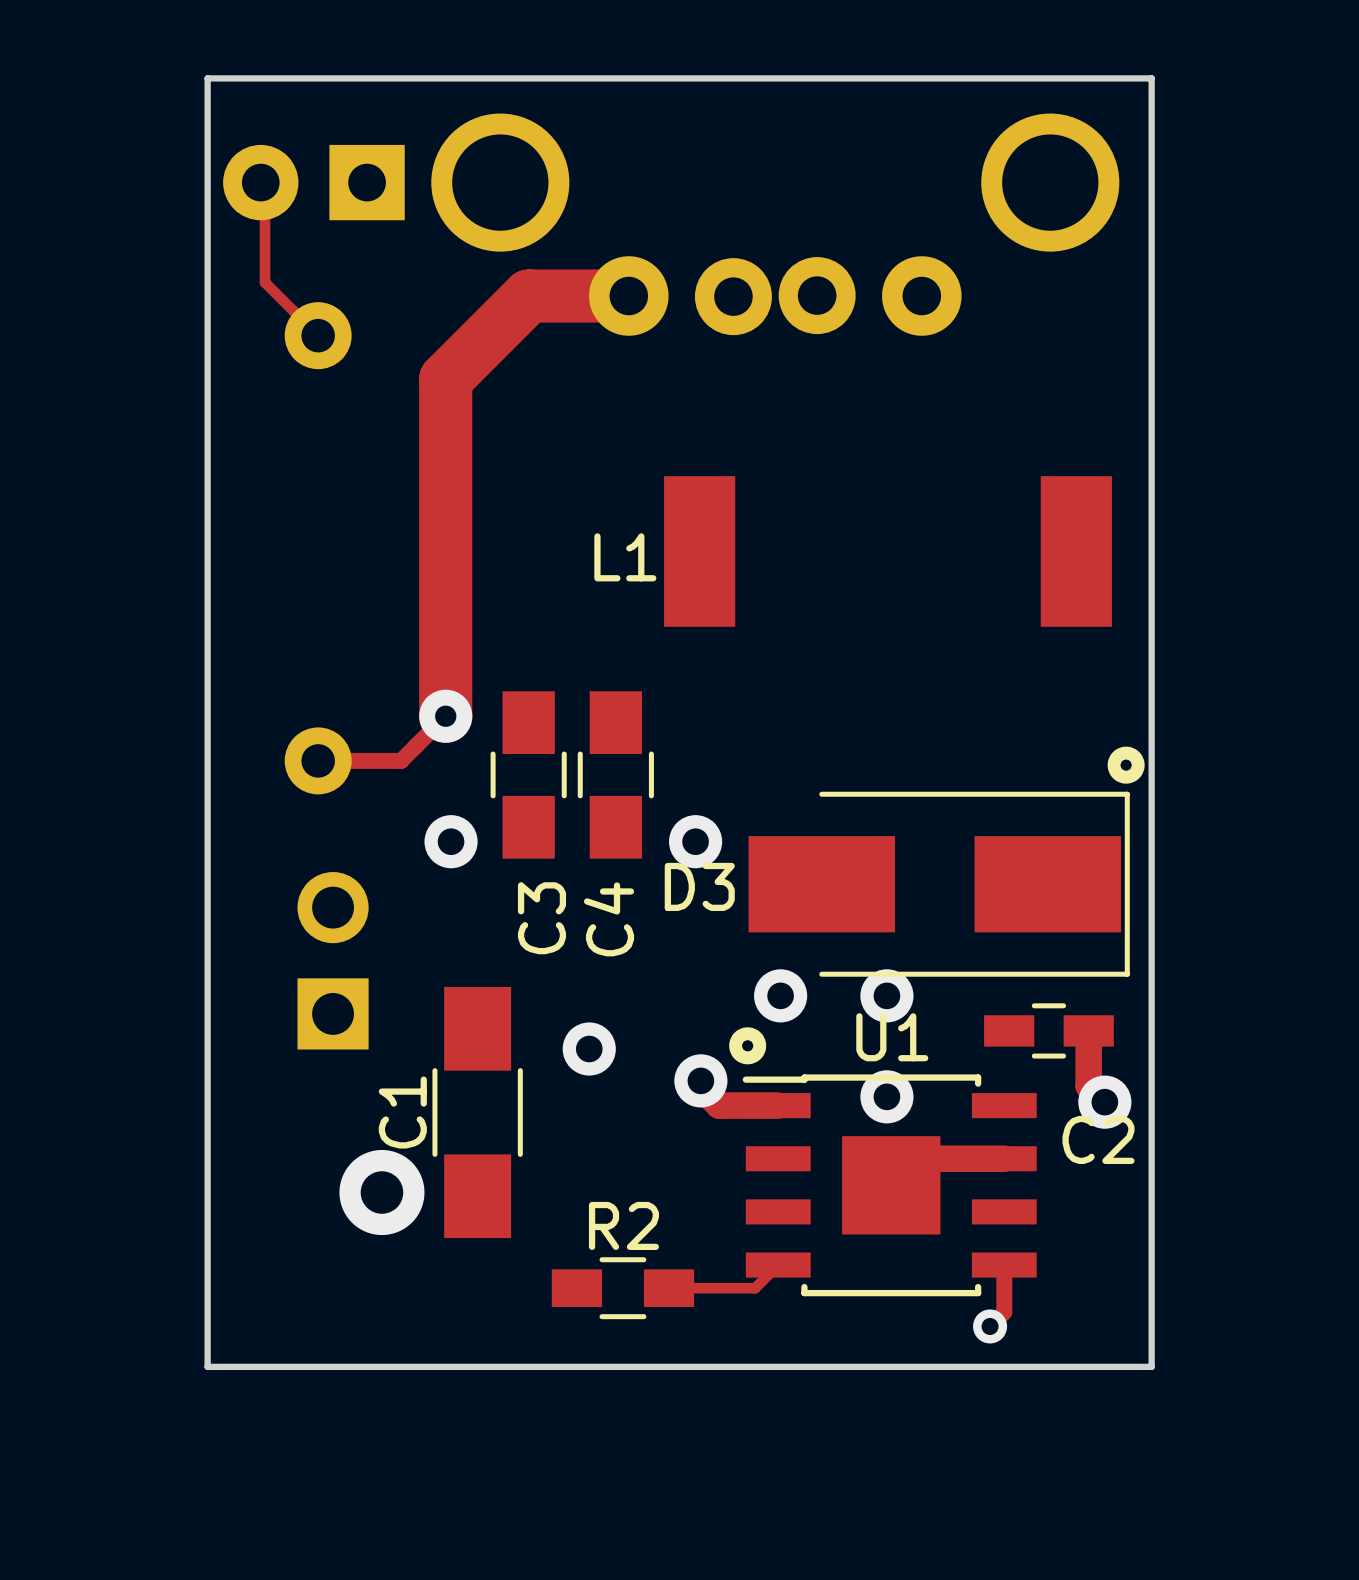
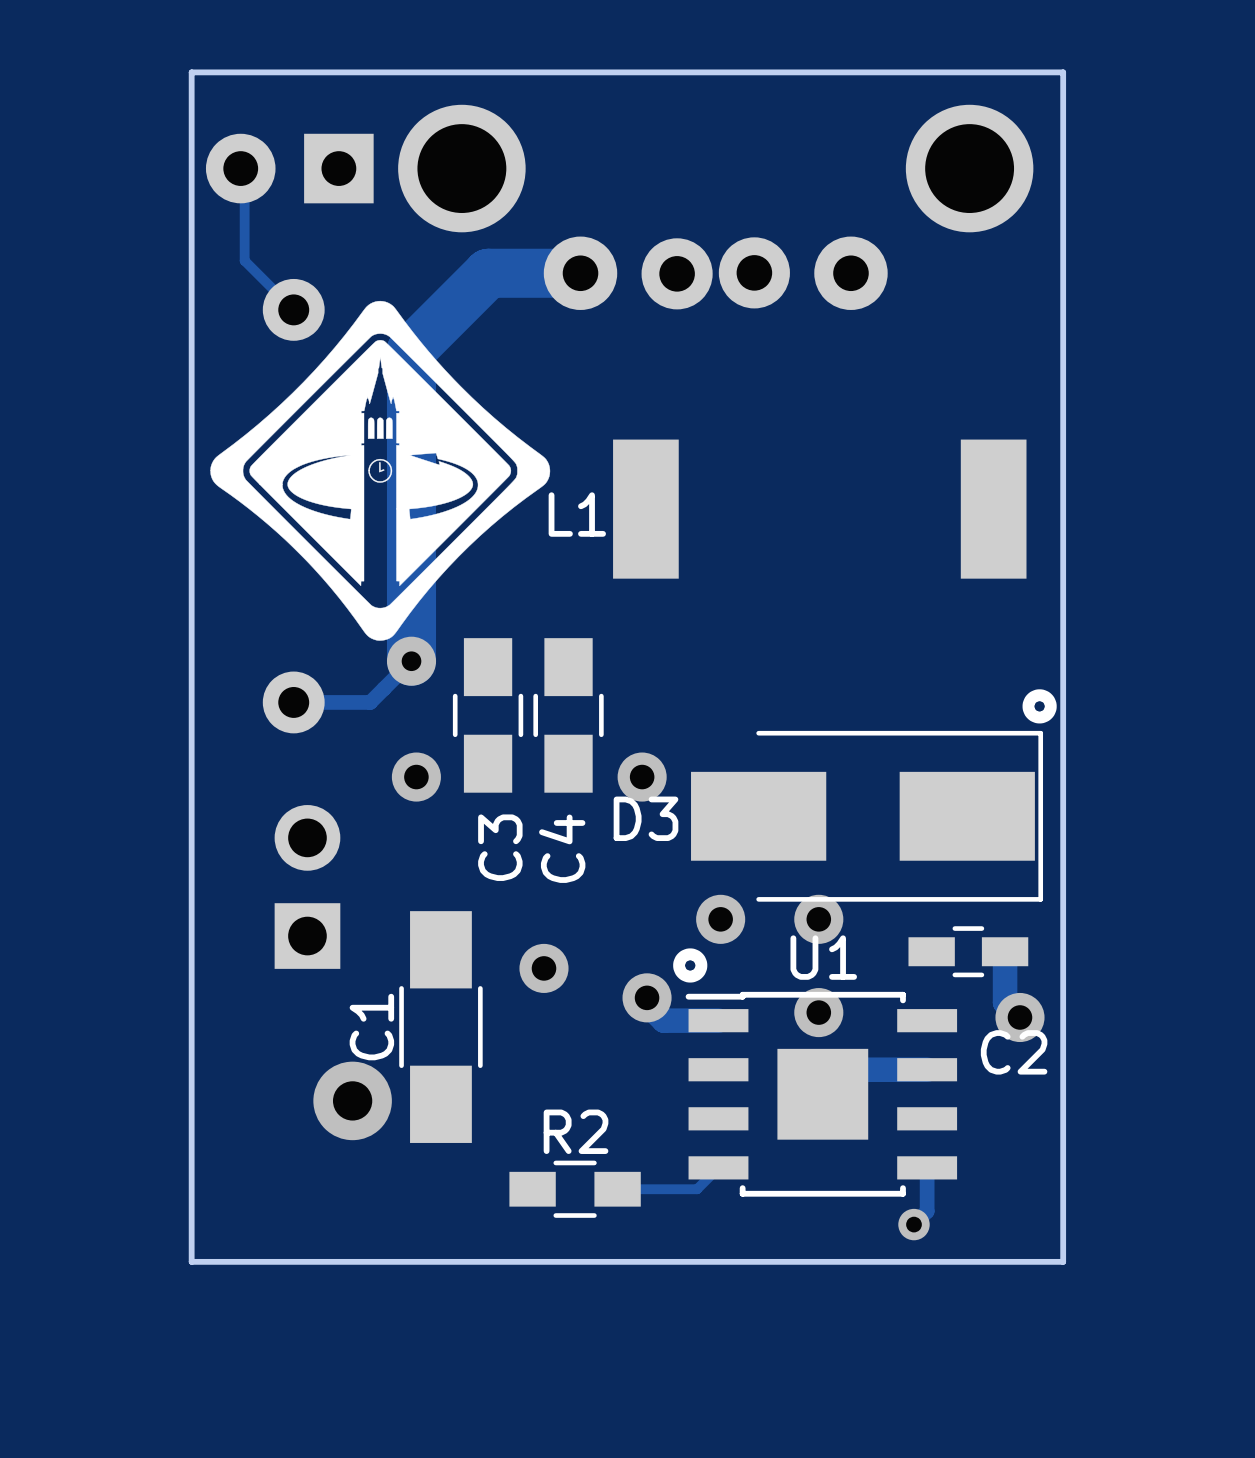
drawing: none -> [210, 300, 551, 641]

